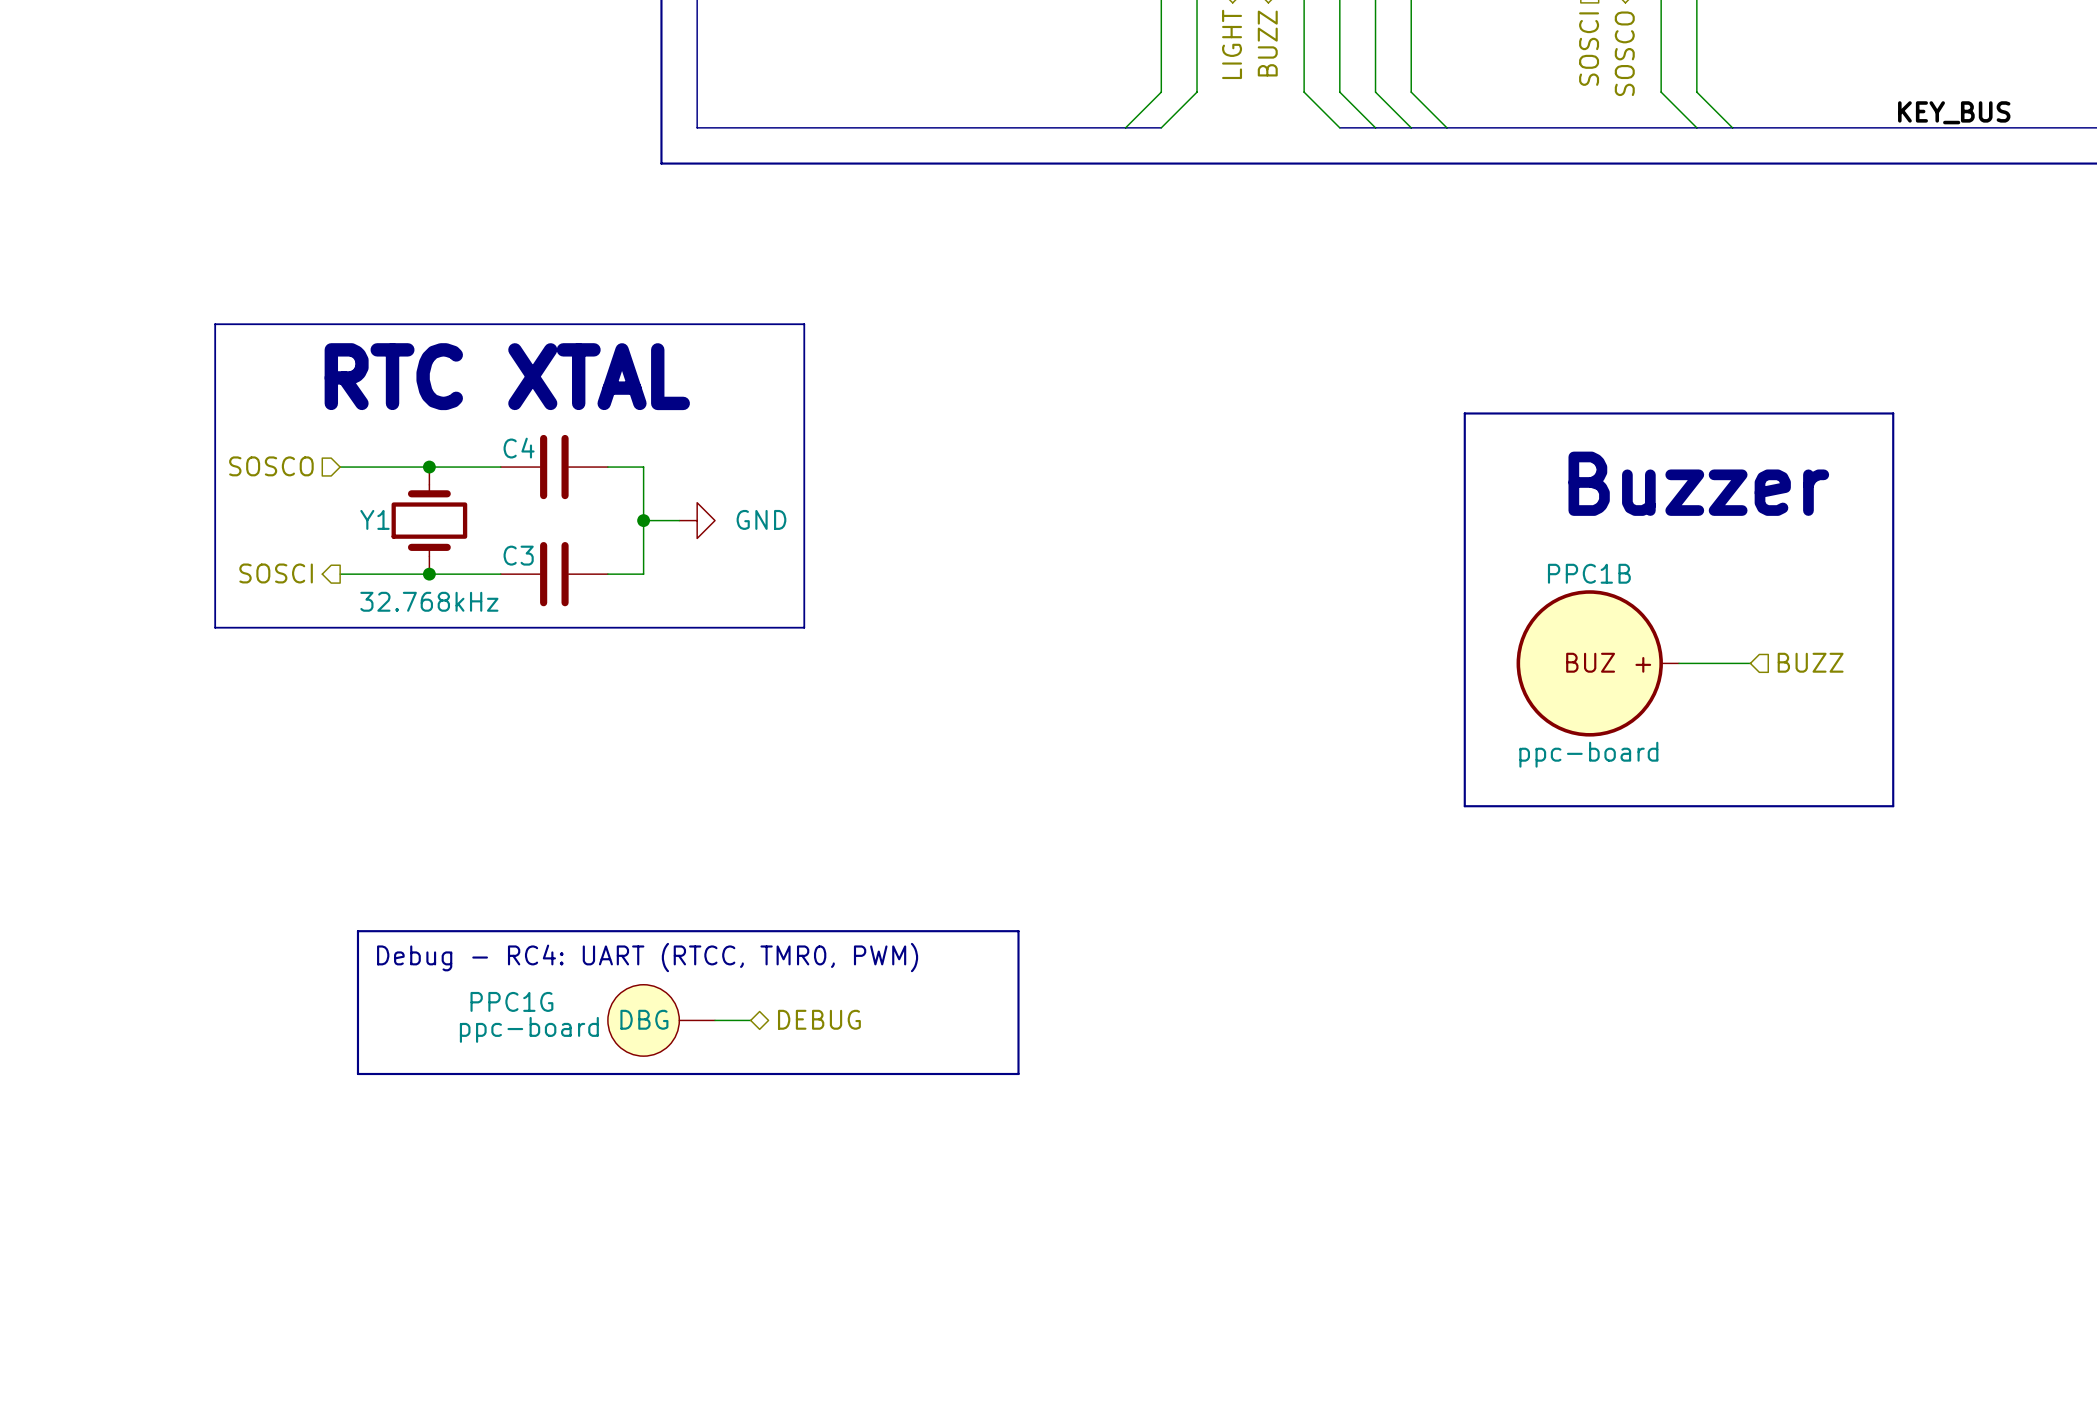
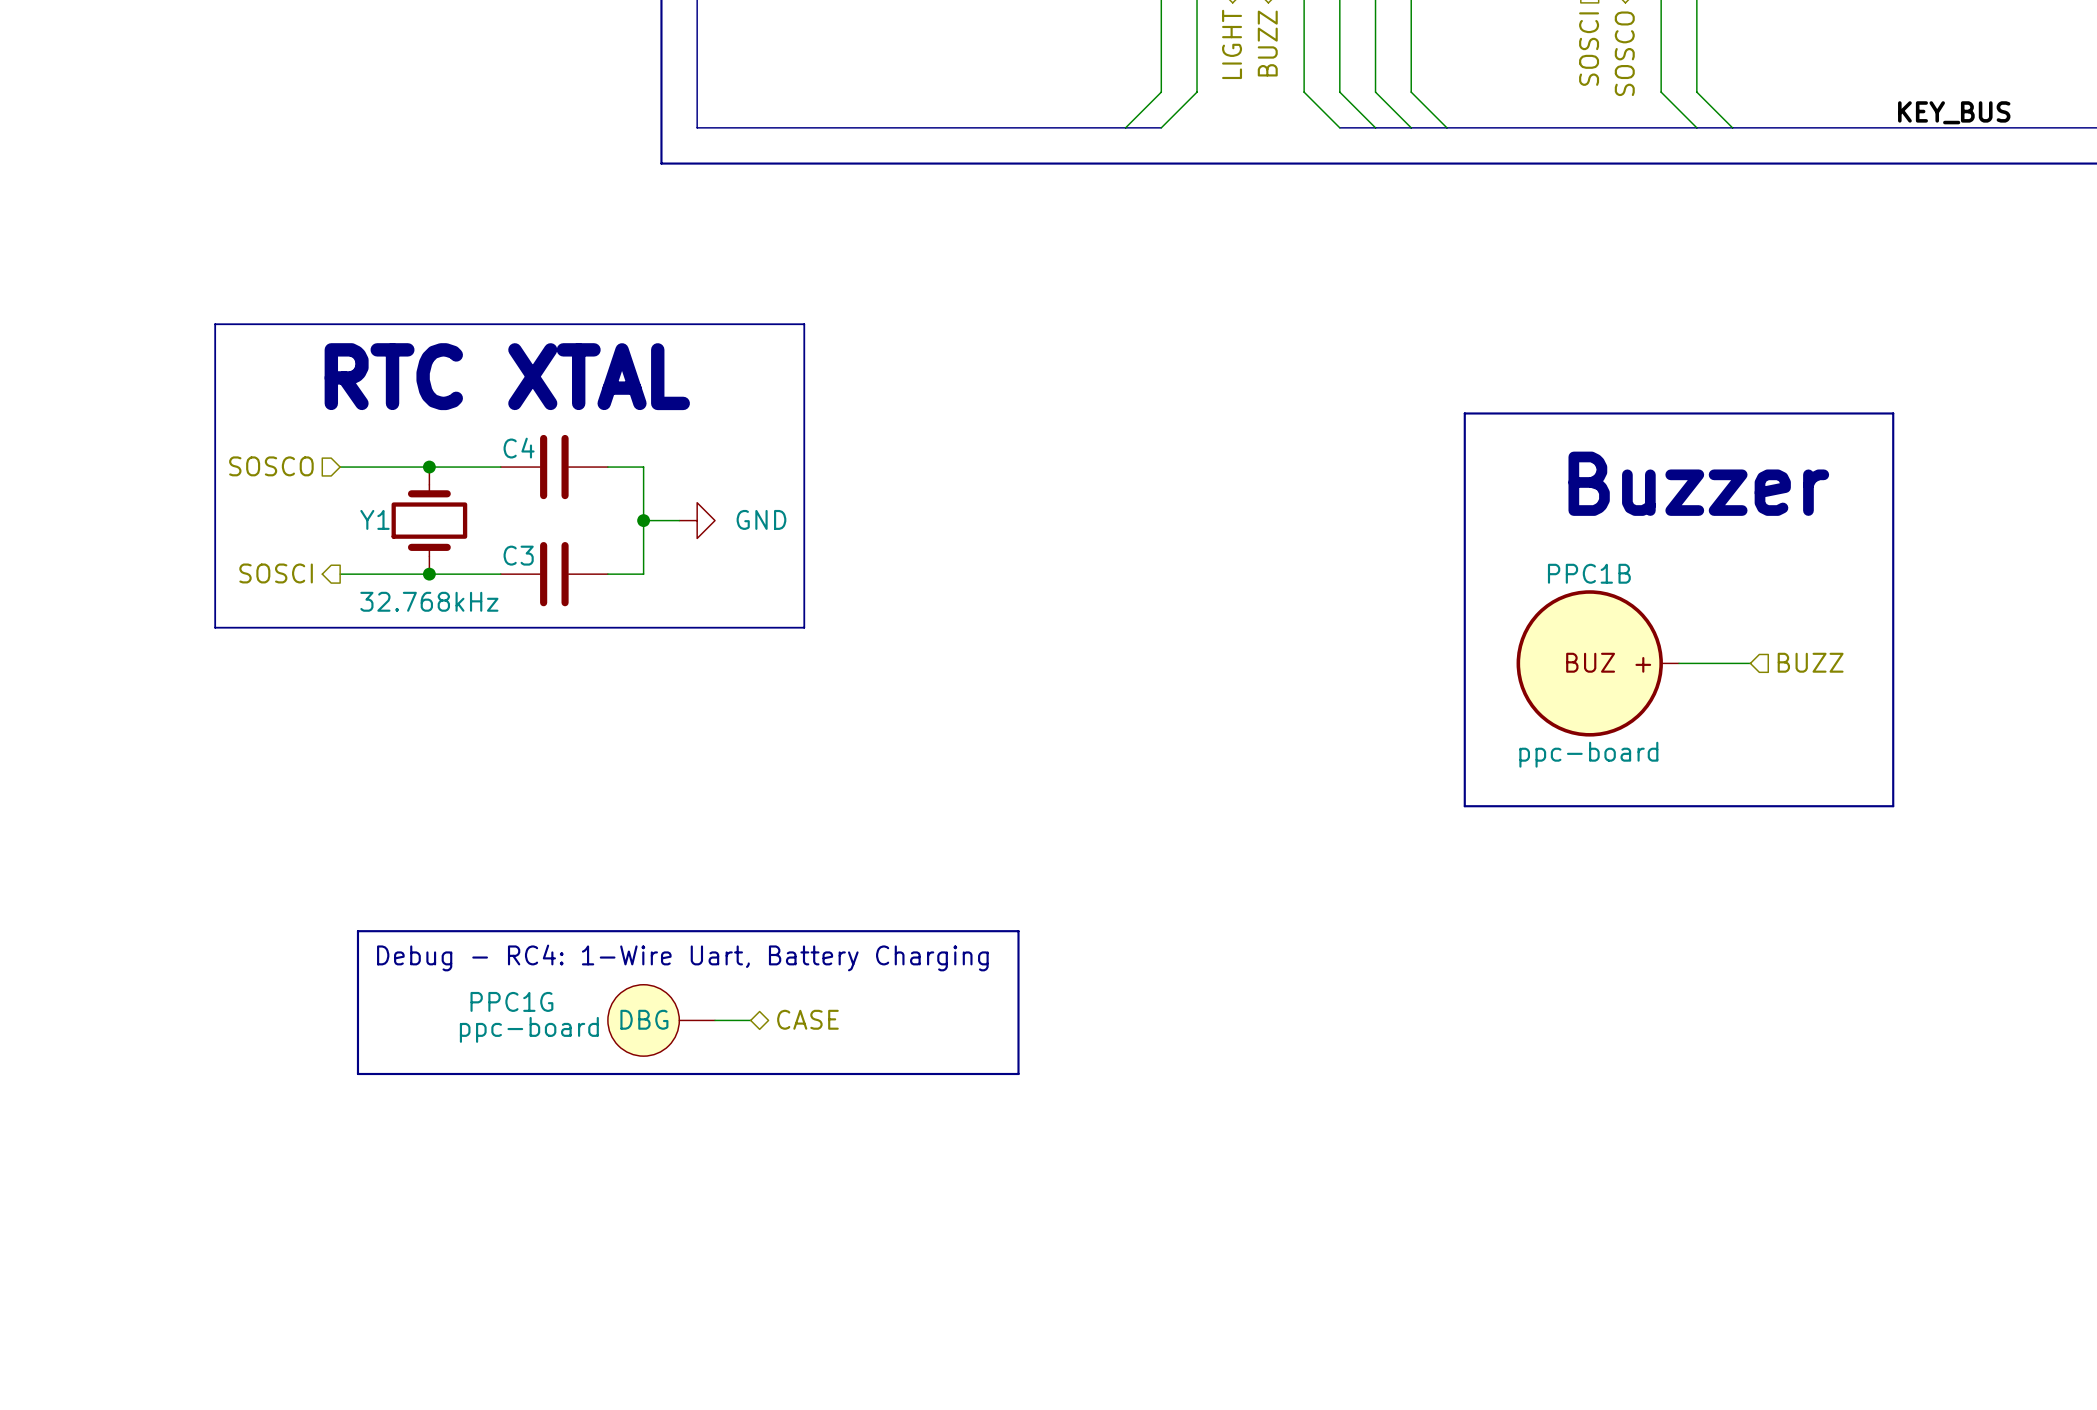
text: Debug - RC4: UART (RTCC, TMR0, PWM) (647, 957) -> Debug - RC4: 1-Wire Uart, Battery Charging (682, 957)
hierarchical label: DEBUG (819, 1019) -> CASE (807, 1019)

